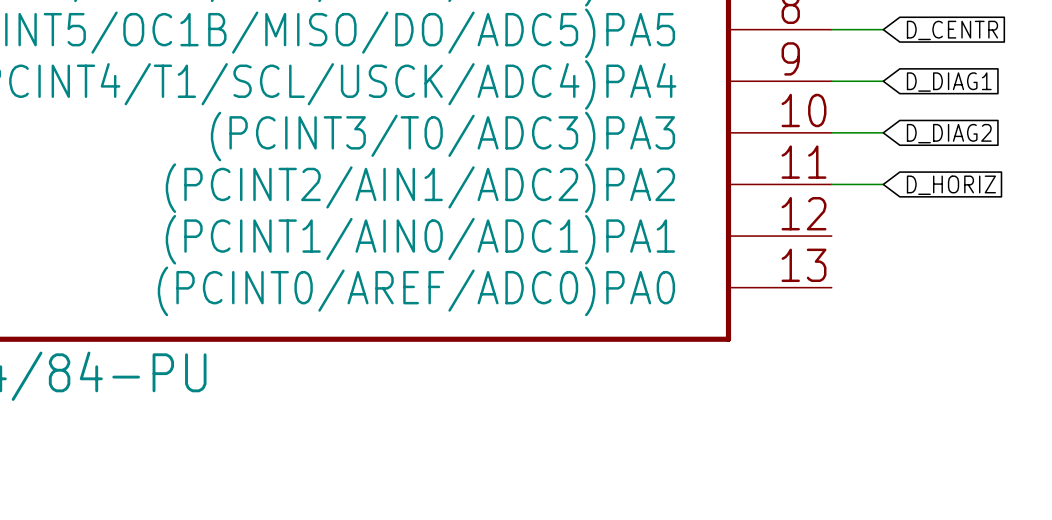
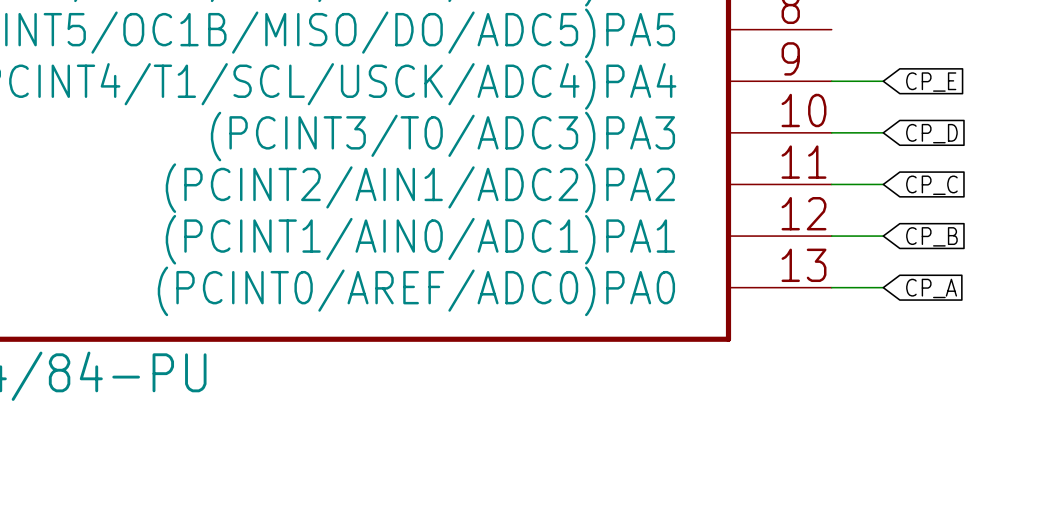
wire: (831, 29) (883, 29) -> (831, 236) (883, 236)
global label: D_CENTR (952, 30) -> none
global label: D_DIAG1 (949, 82) -> CP_E (931, 82)
global label: D_DIAG2 (949, 133) -> CP_D (931, 133)
global label: D_HORIZ (951, 185) -> CP_C (931, 185)
global label: none -> CP_B (931, 236)
wire: none -> (831, 287) (883, 287)
global label: none -> CP_A (931, 288)

